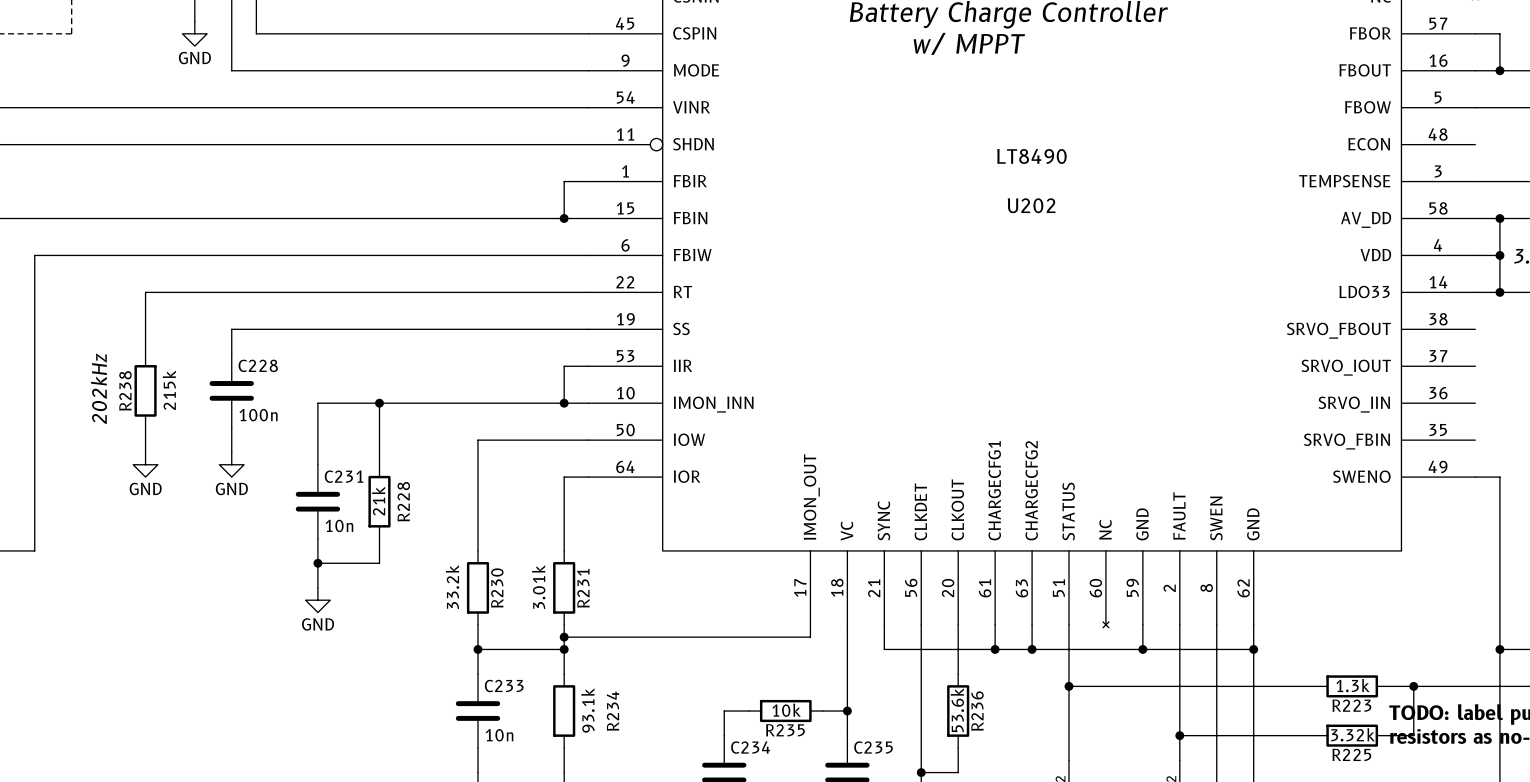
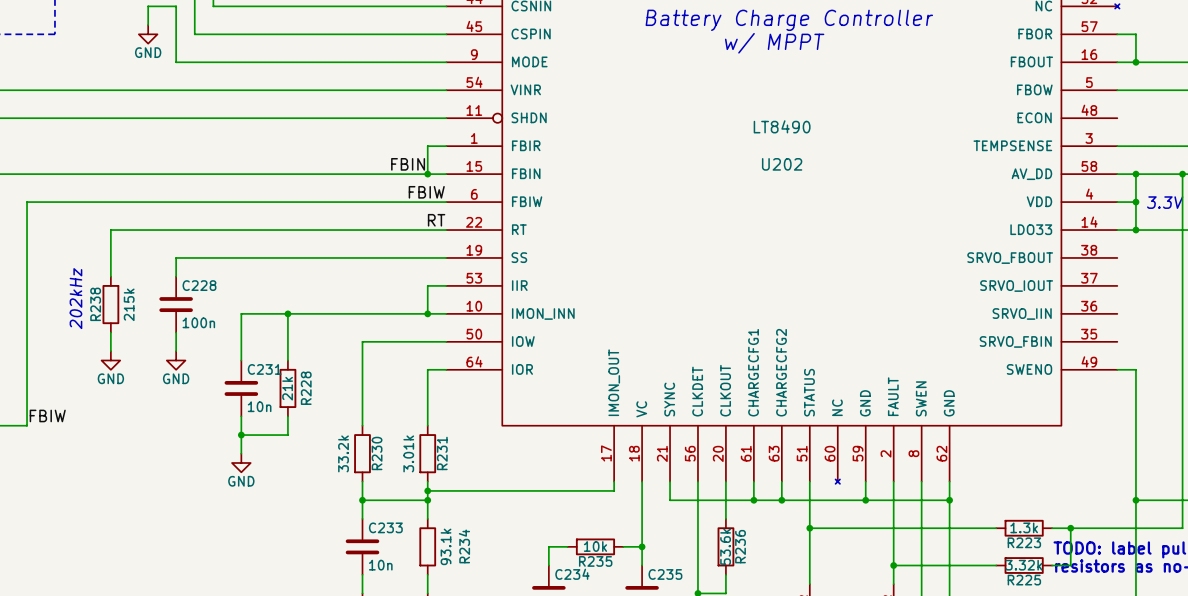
label: none -> FBIN (408, 164)
label: none -> FBIW (426, 192)
label: none -> RT (436, 220)
label: none -> FBIW (47, 415)

